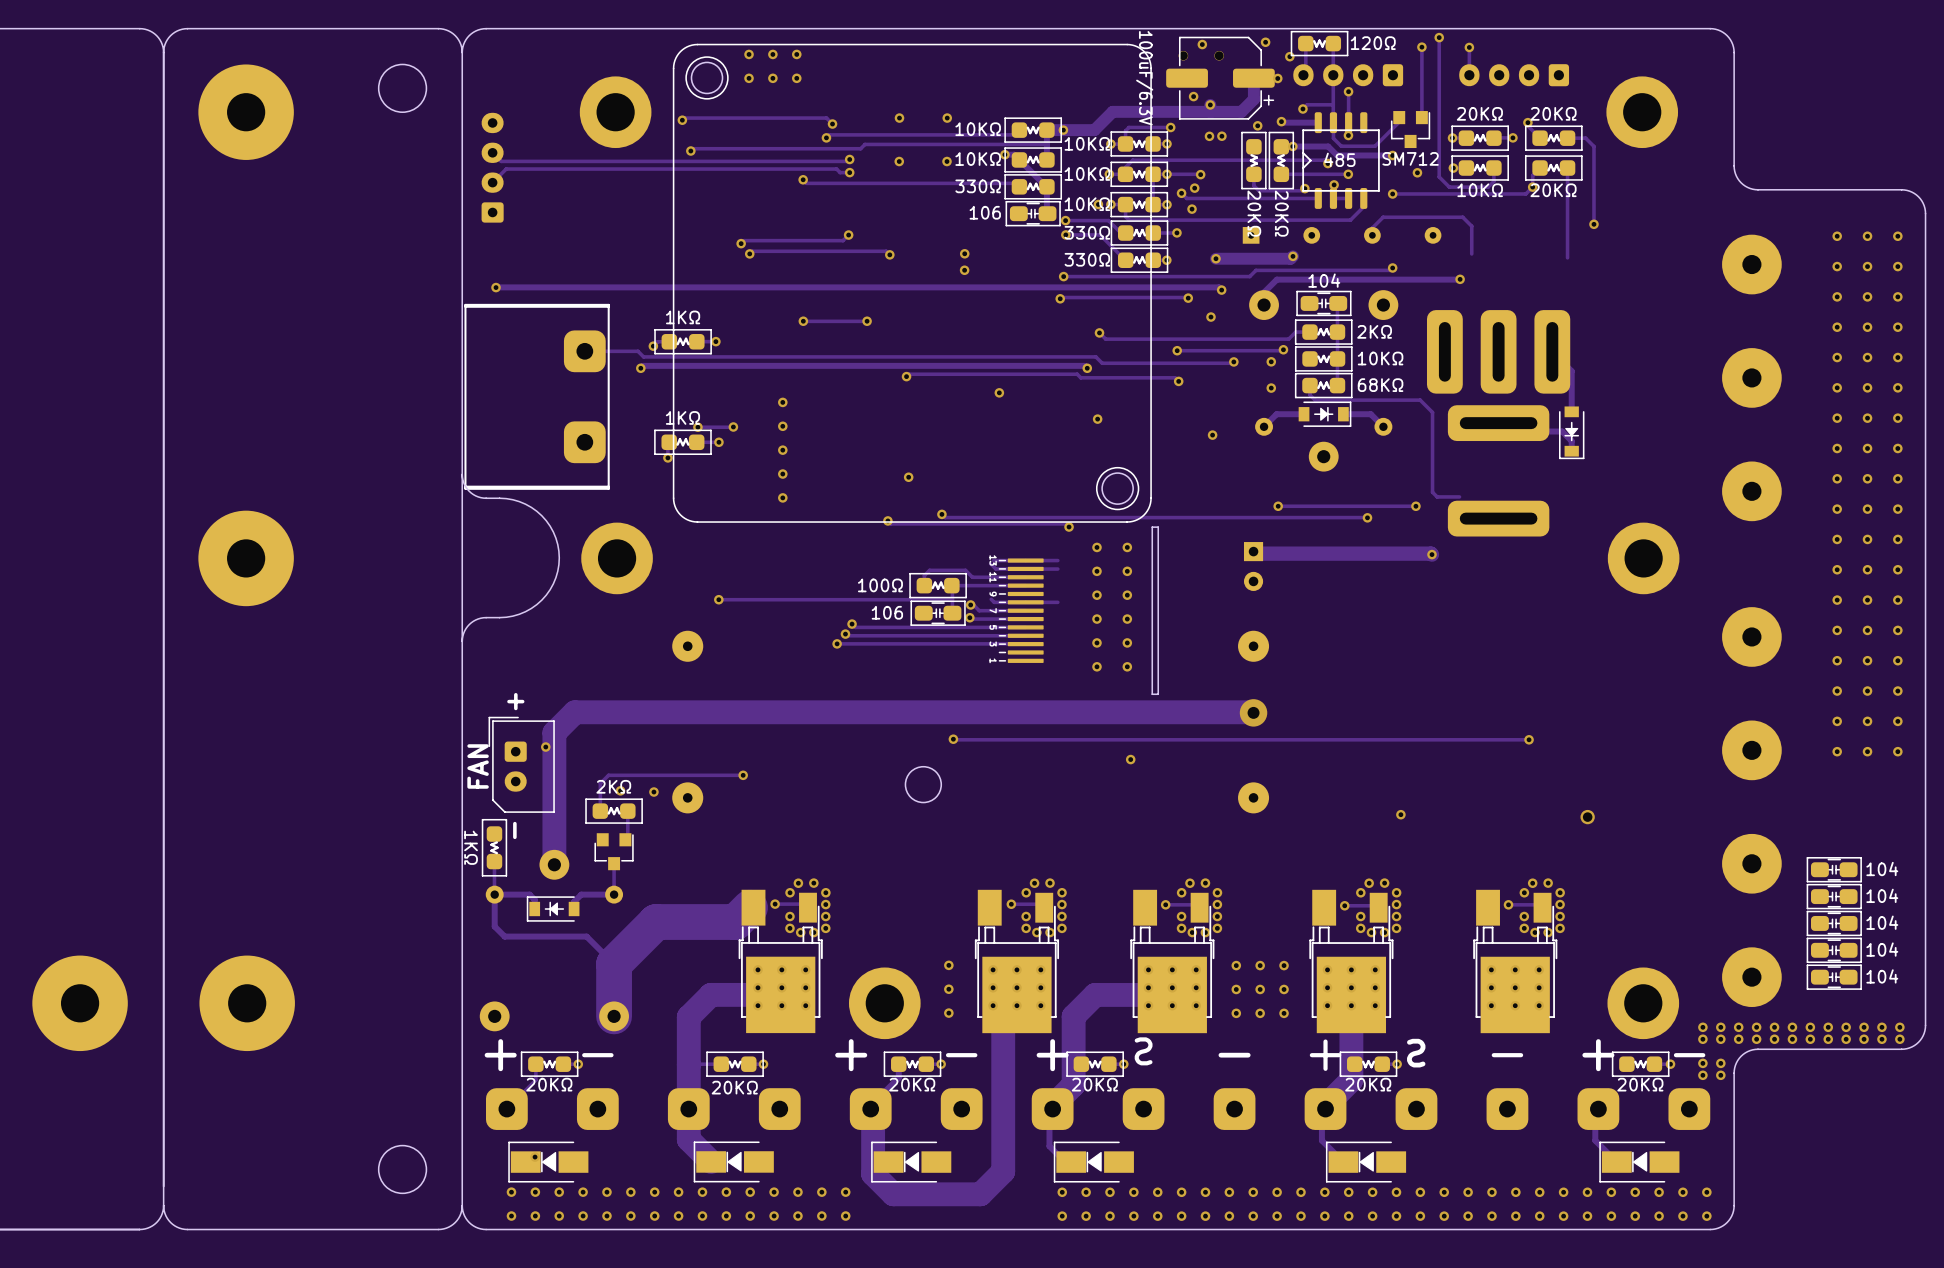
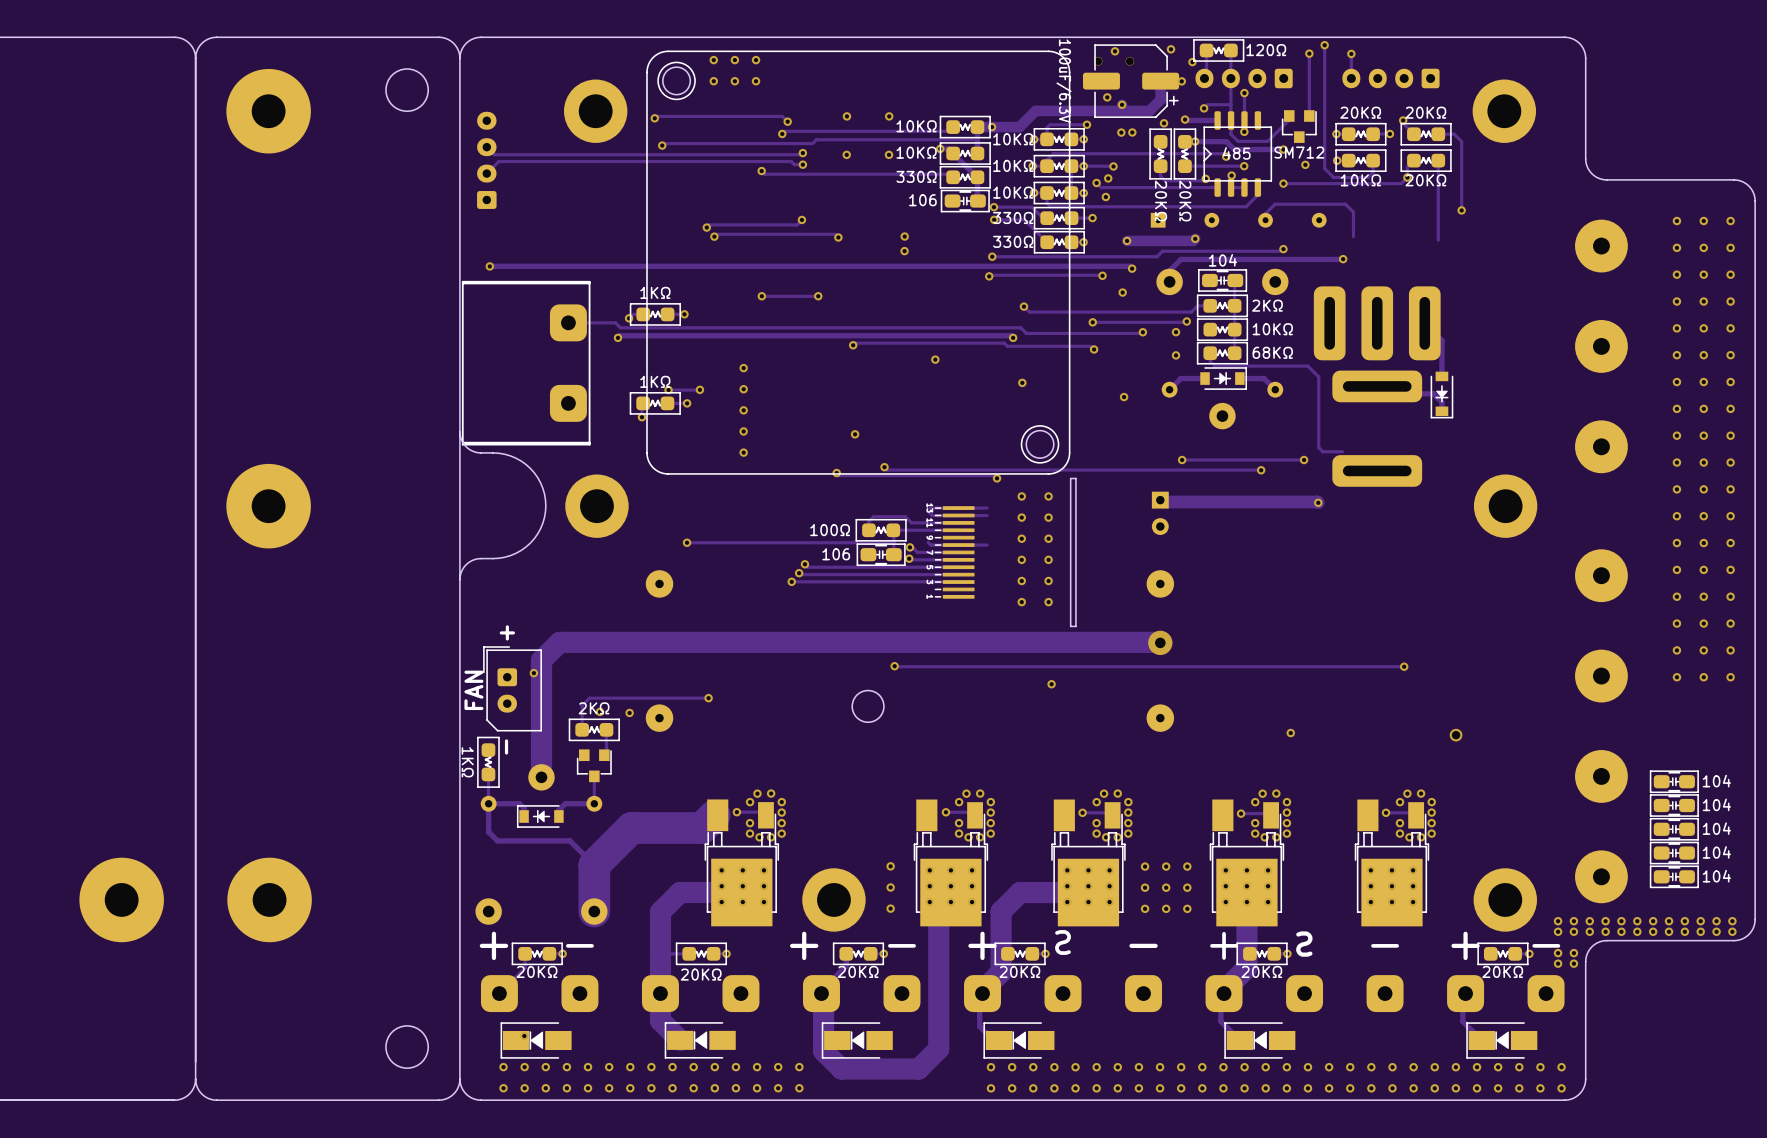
via: (1098, 204) -> none

